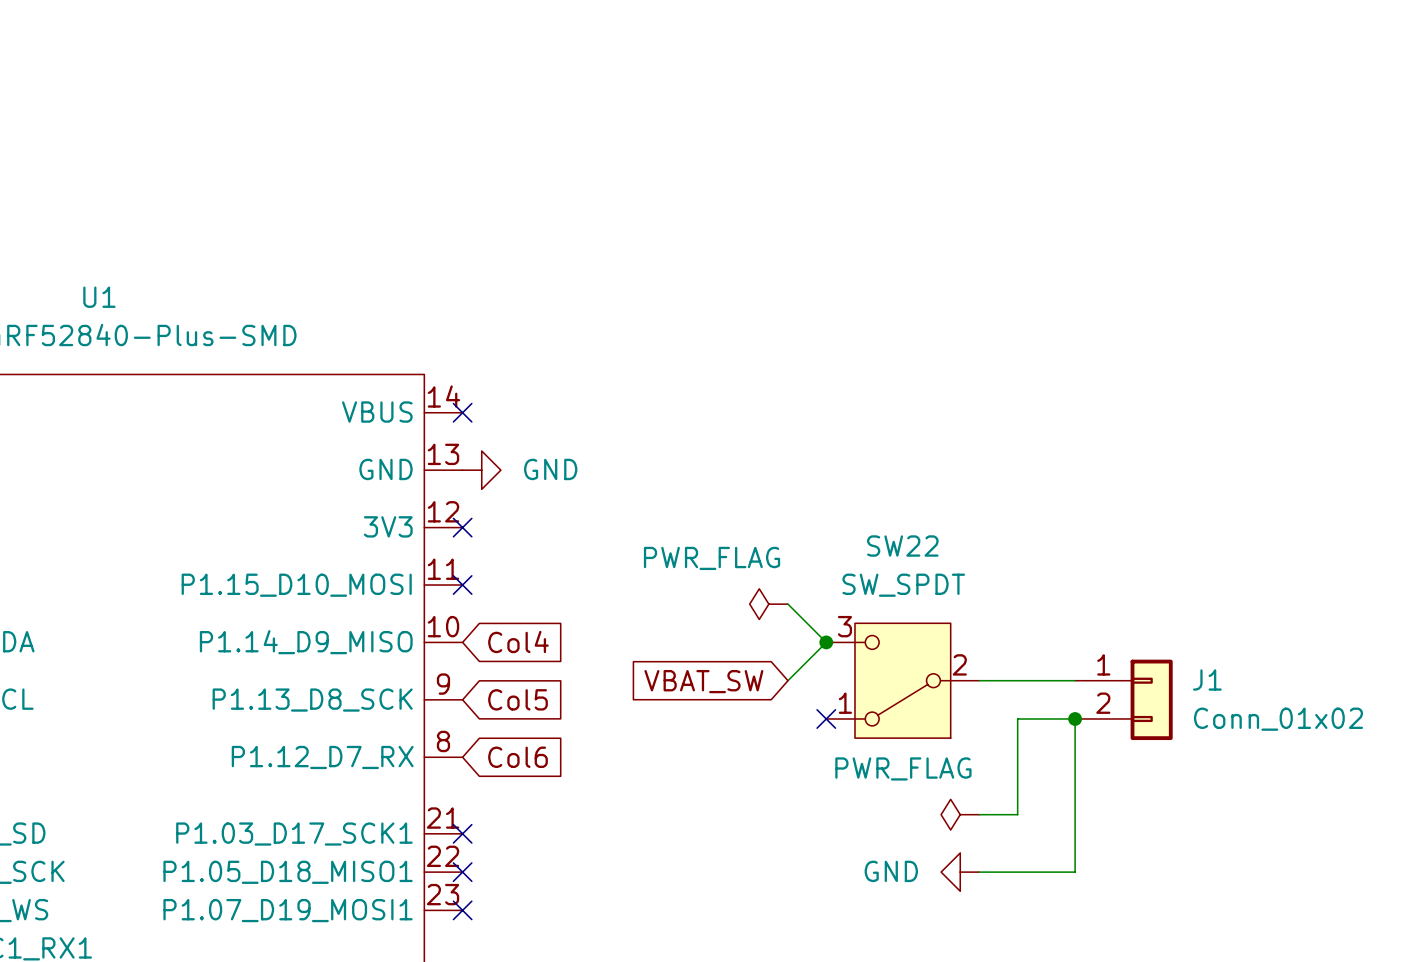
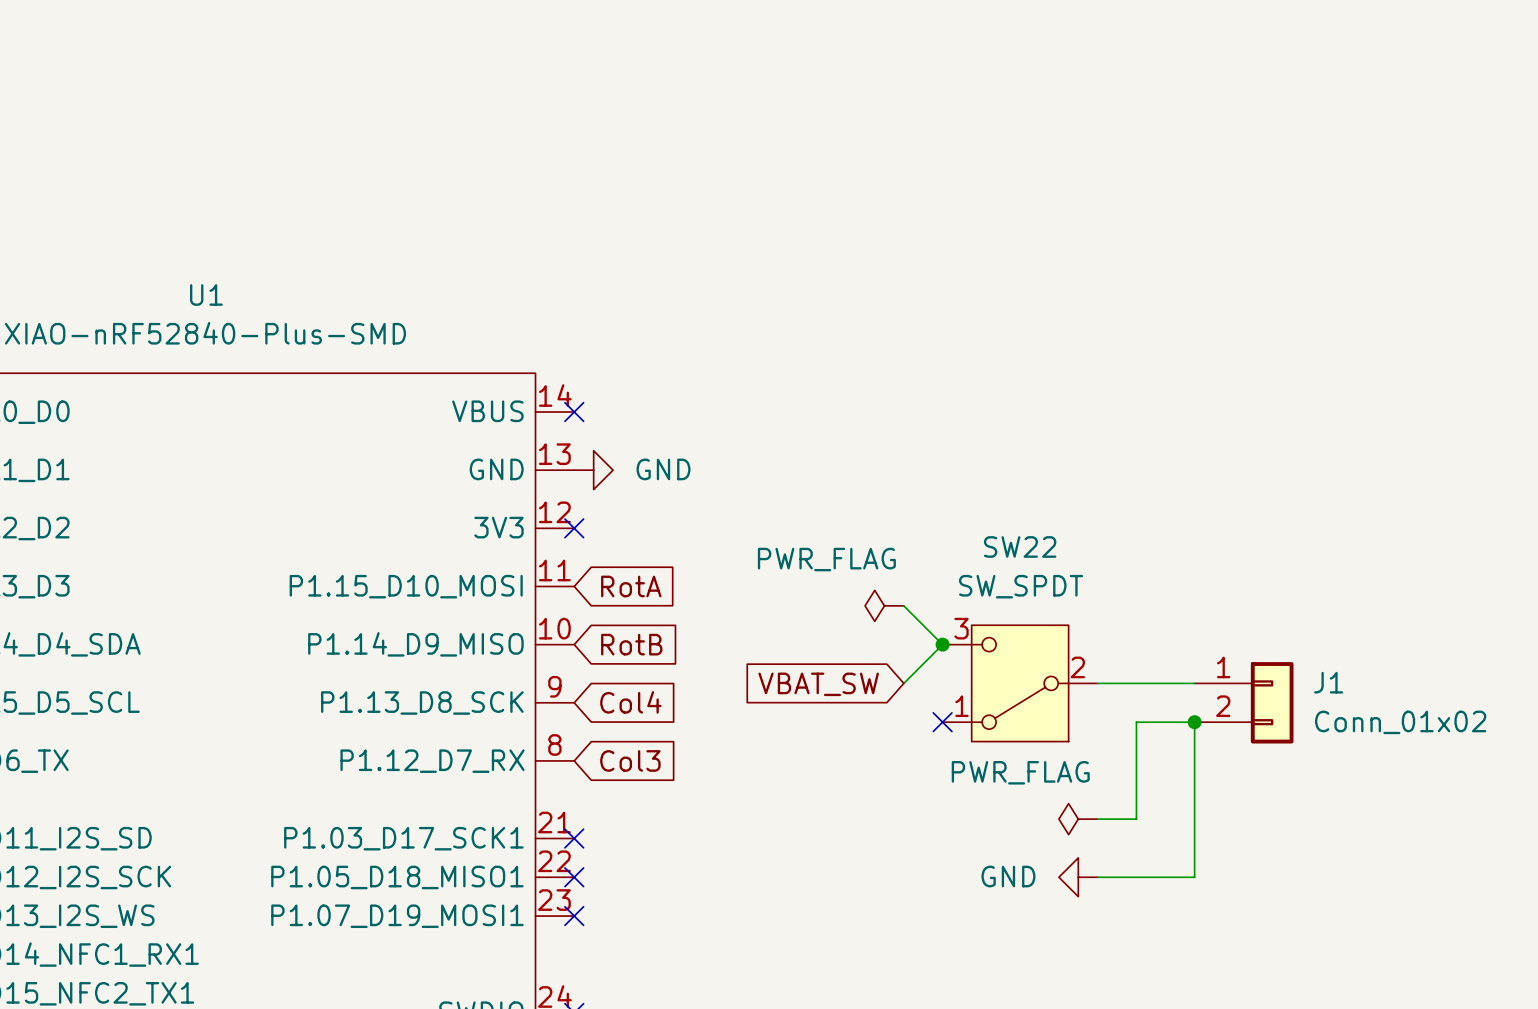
no-connect mark: (462, 585) -> none
global label: none -> RotA (631, 586)
global label: Col4 (518, 641) -> RotB (631, 644)
global label: Col5 (518, 699) -> Col4 (630, 702)
global label: Col6 (518, 757) -> Col3 (630, 760)

